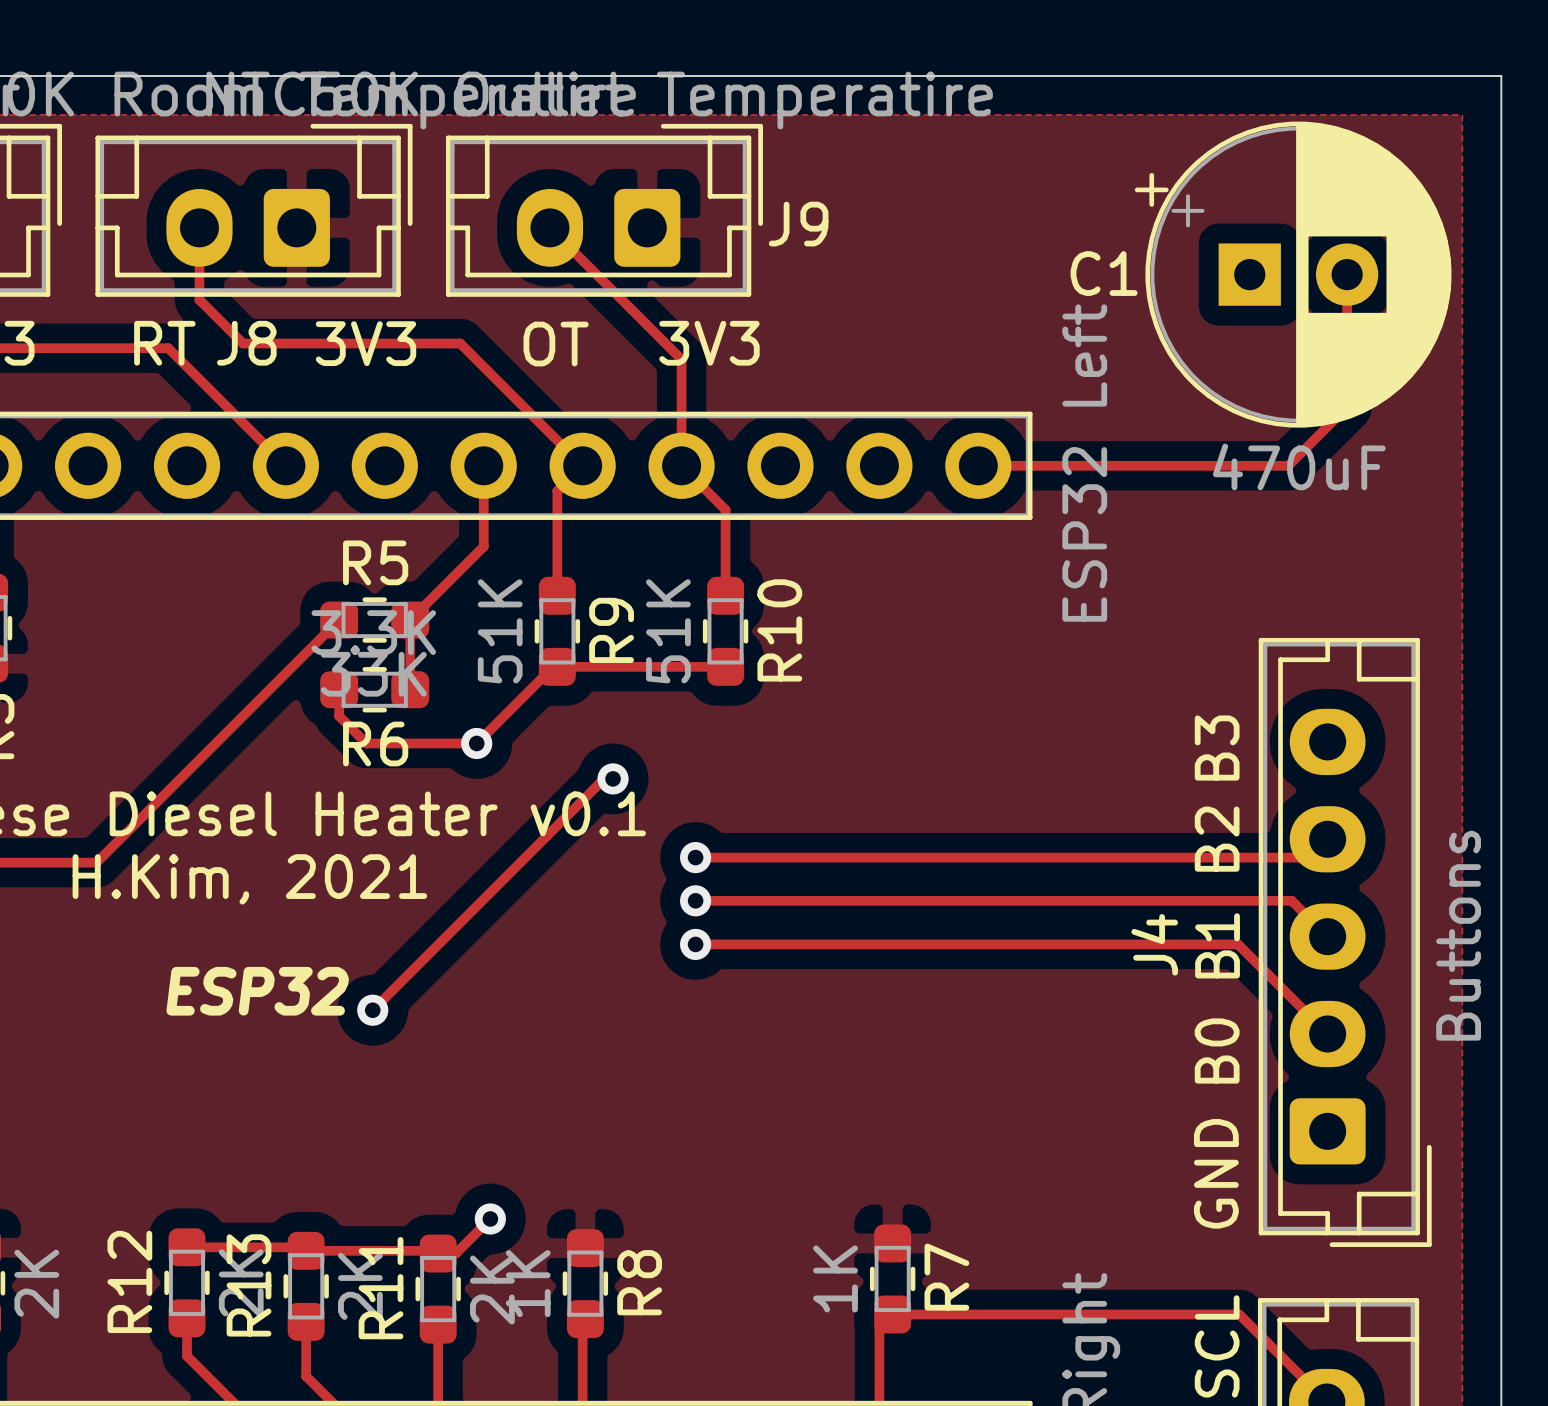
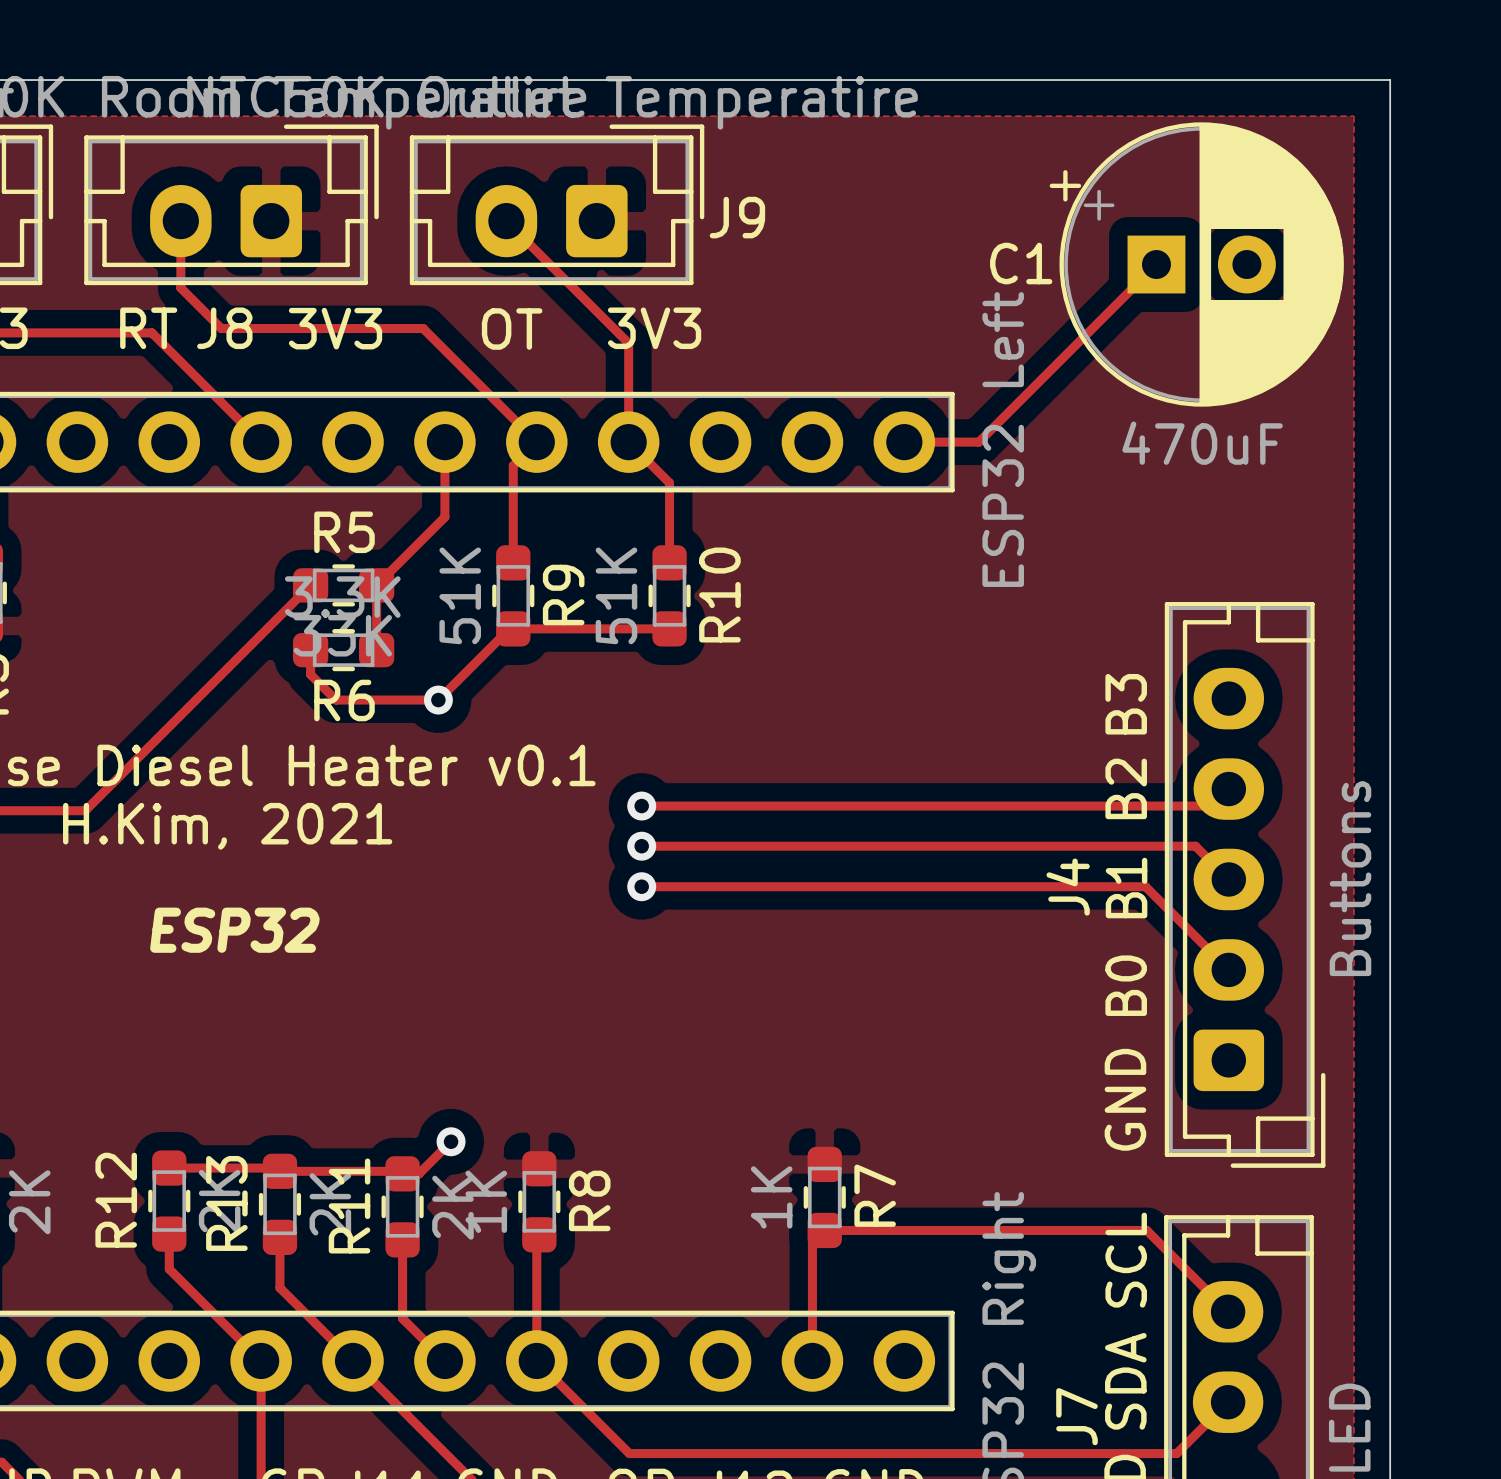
track: (1347, 274) (1347, 407) (1288, 465) (1058, 465) -> (1156, 264) (978, 442)
track: (613, 778) (604, 778) (372, 1010) -> none
via: (613, 778) -> none
via: (372, 1010) -> none

